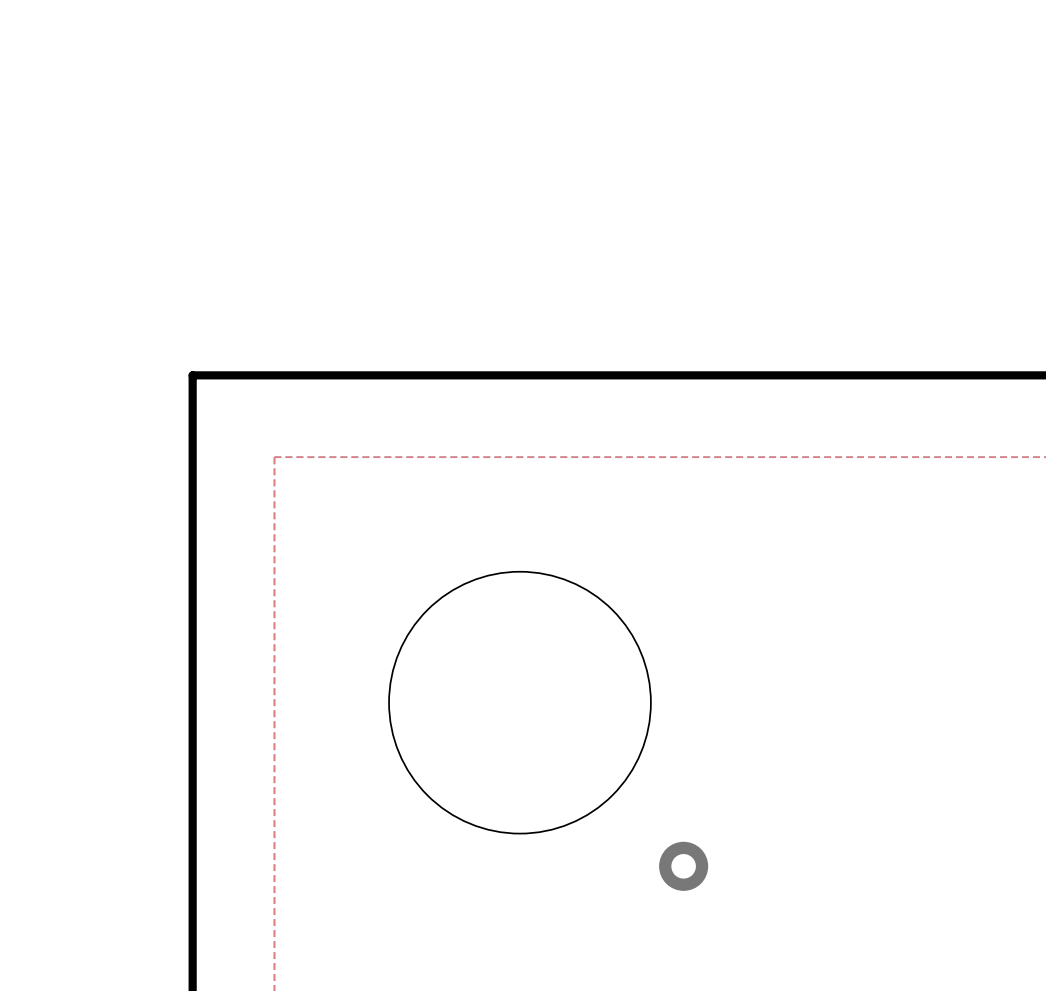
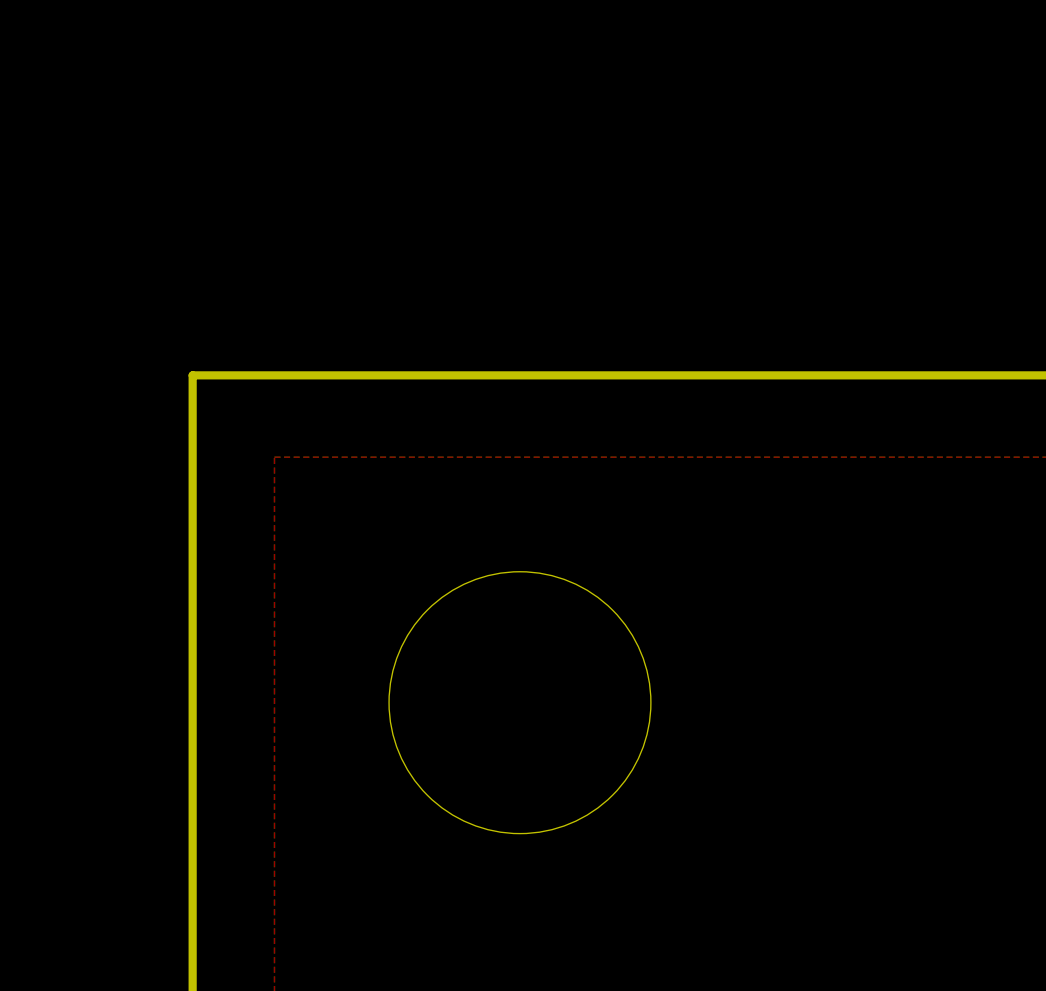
via: (683, 866) -> none

